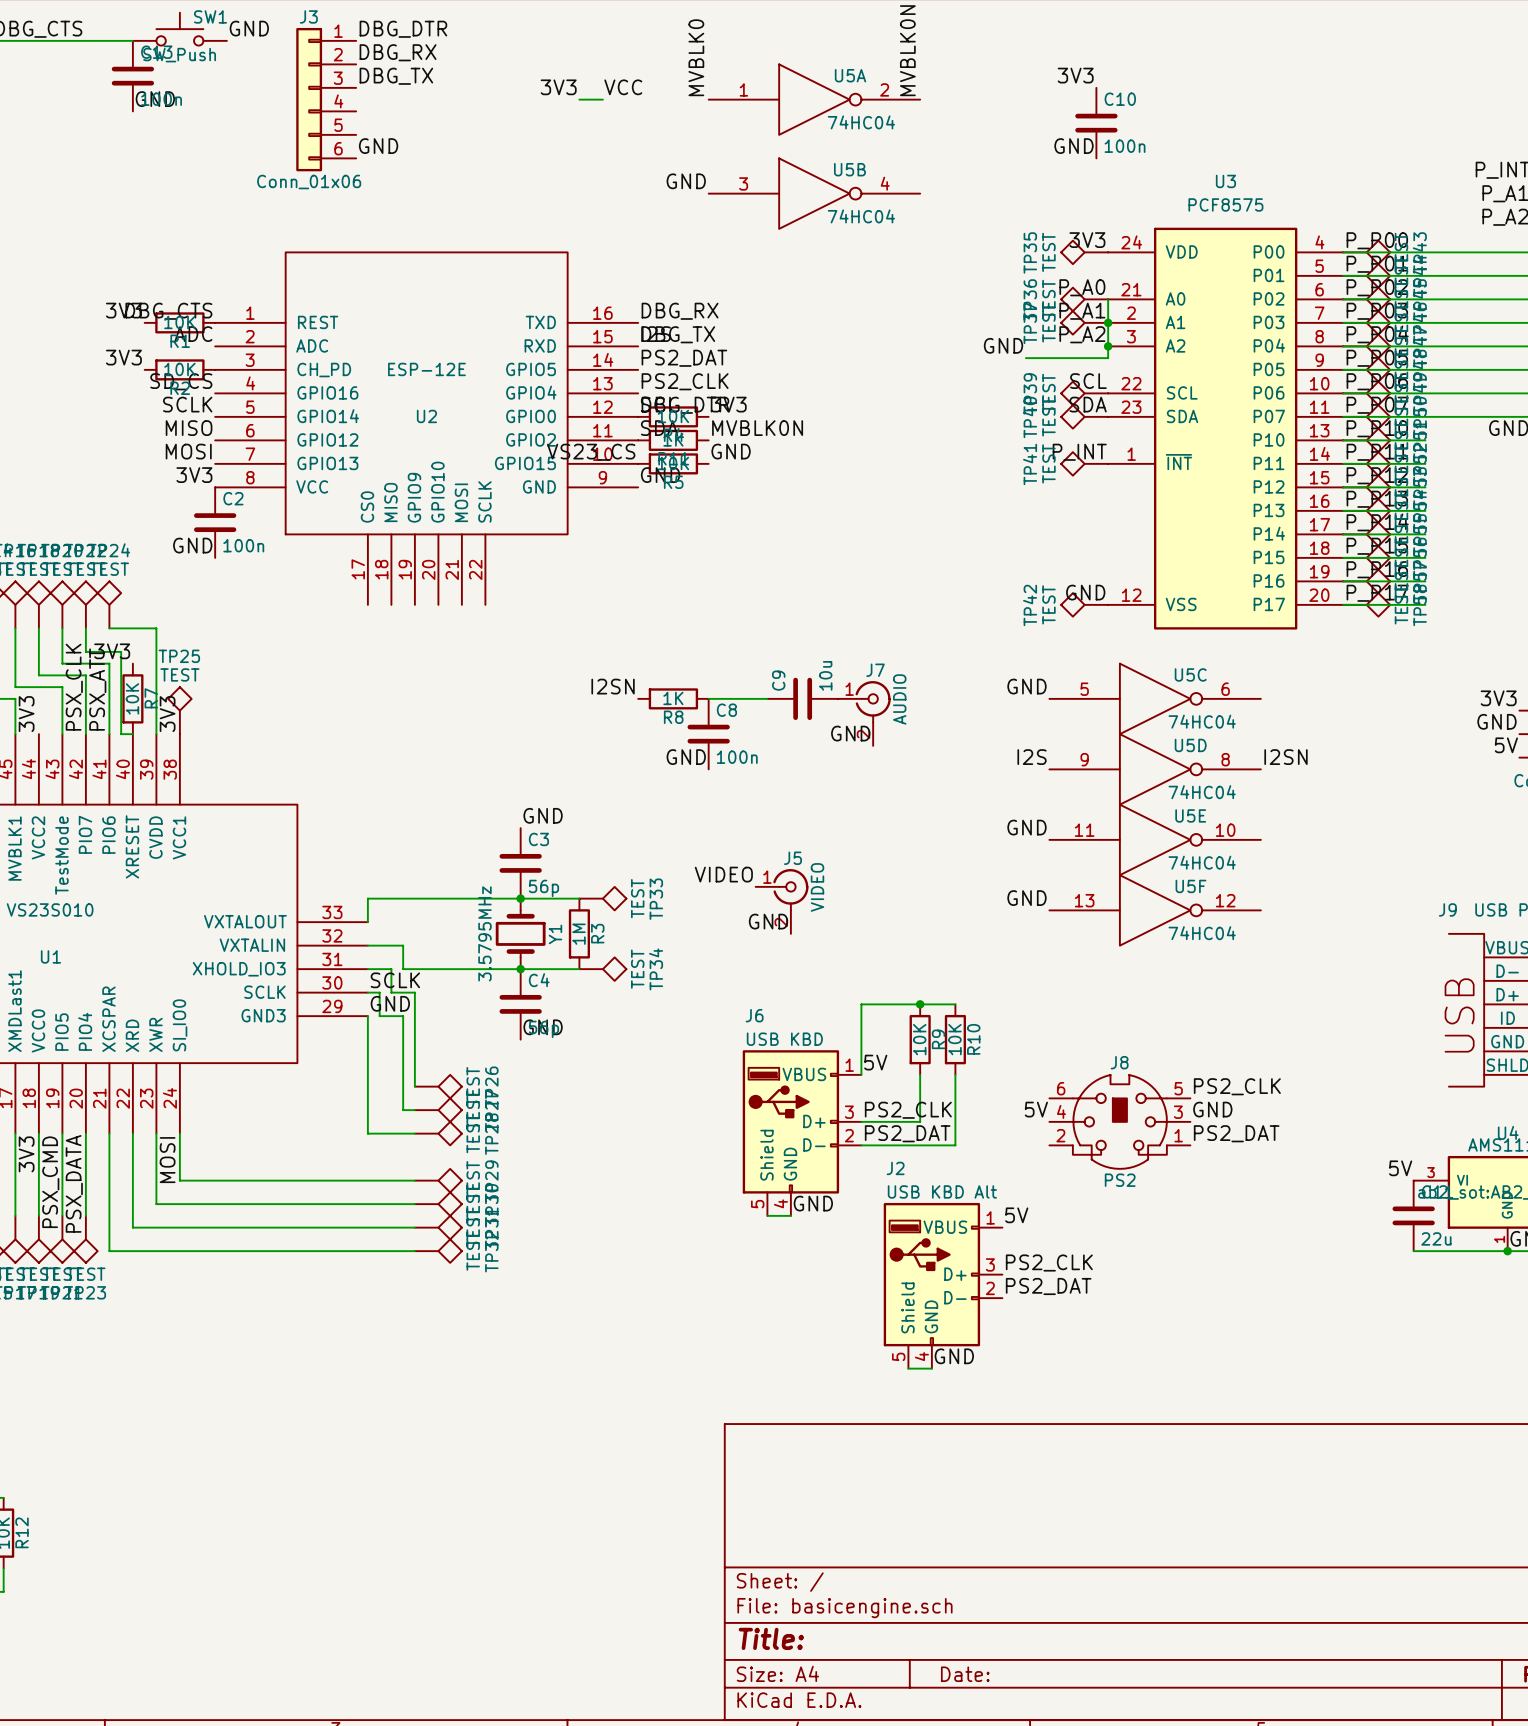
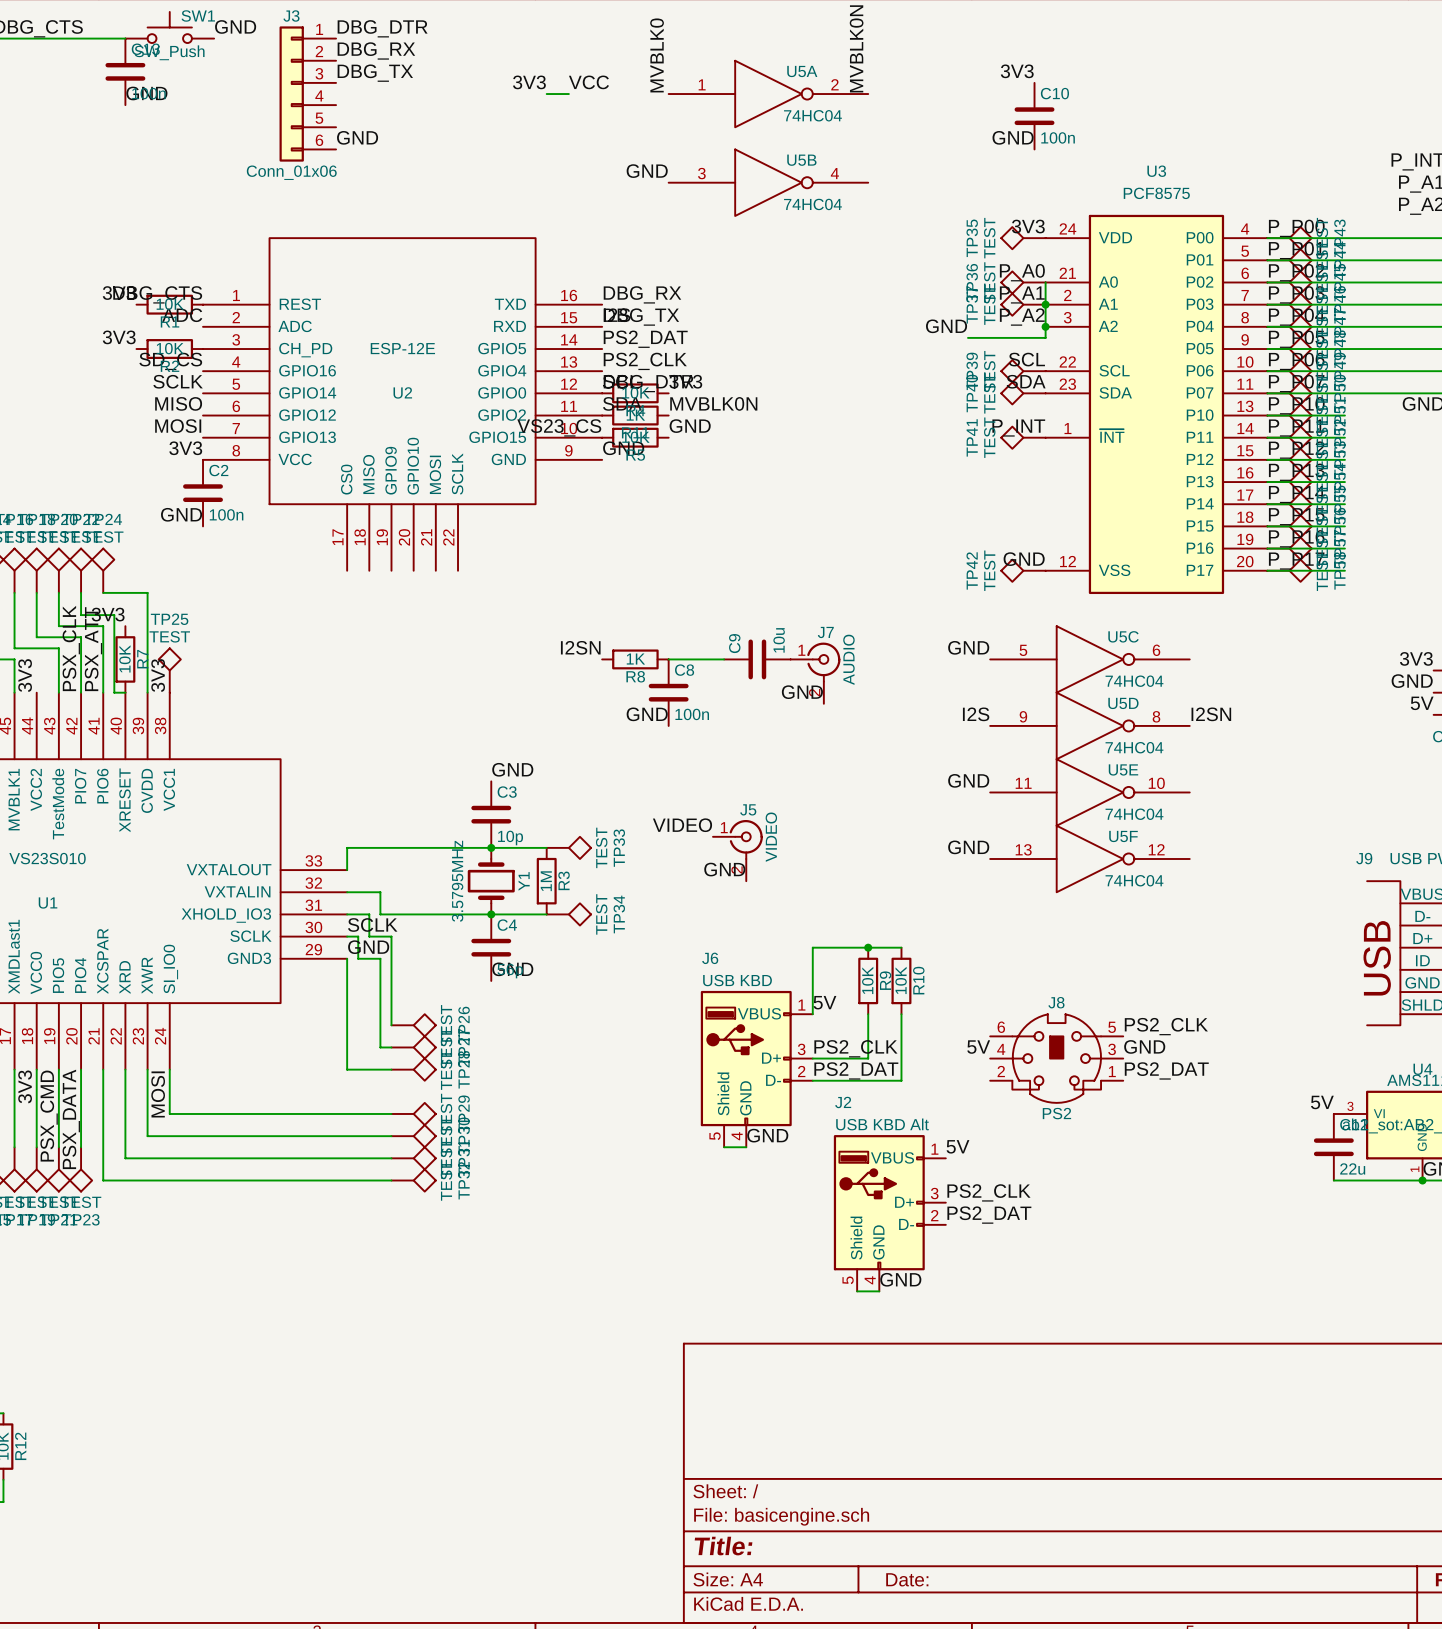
C3 value: 56p (543, 888) -> 10p (510, 837)

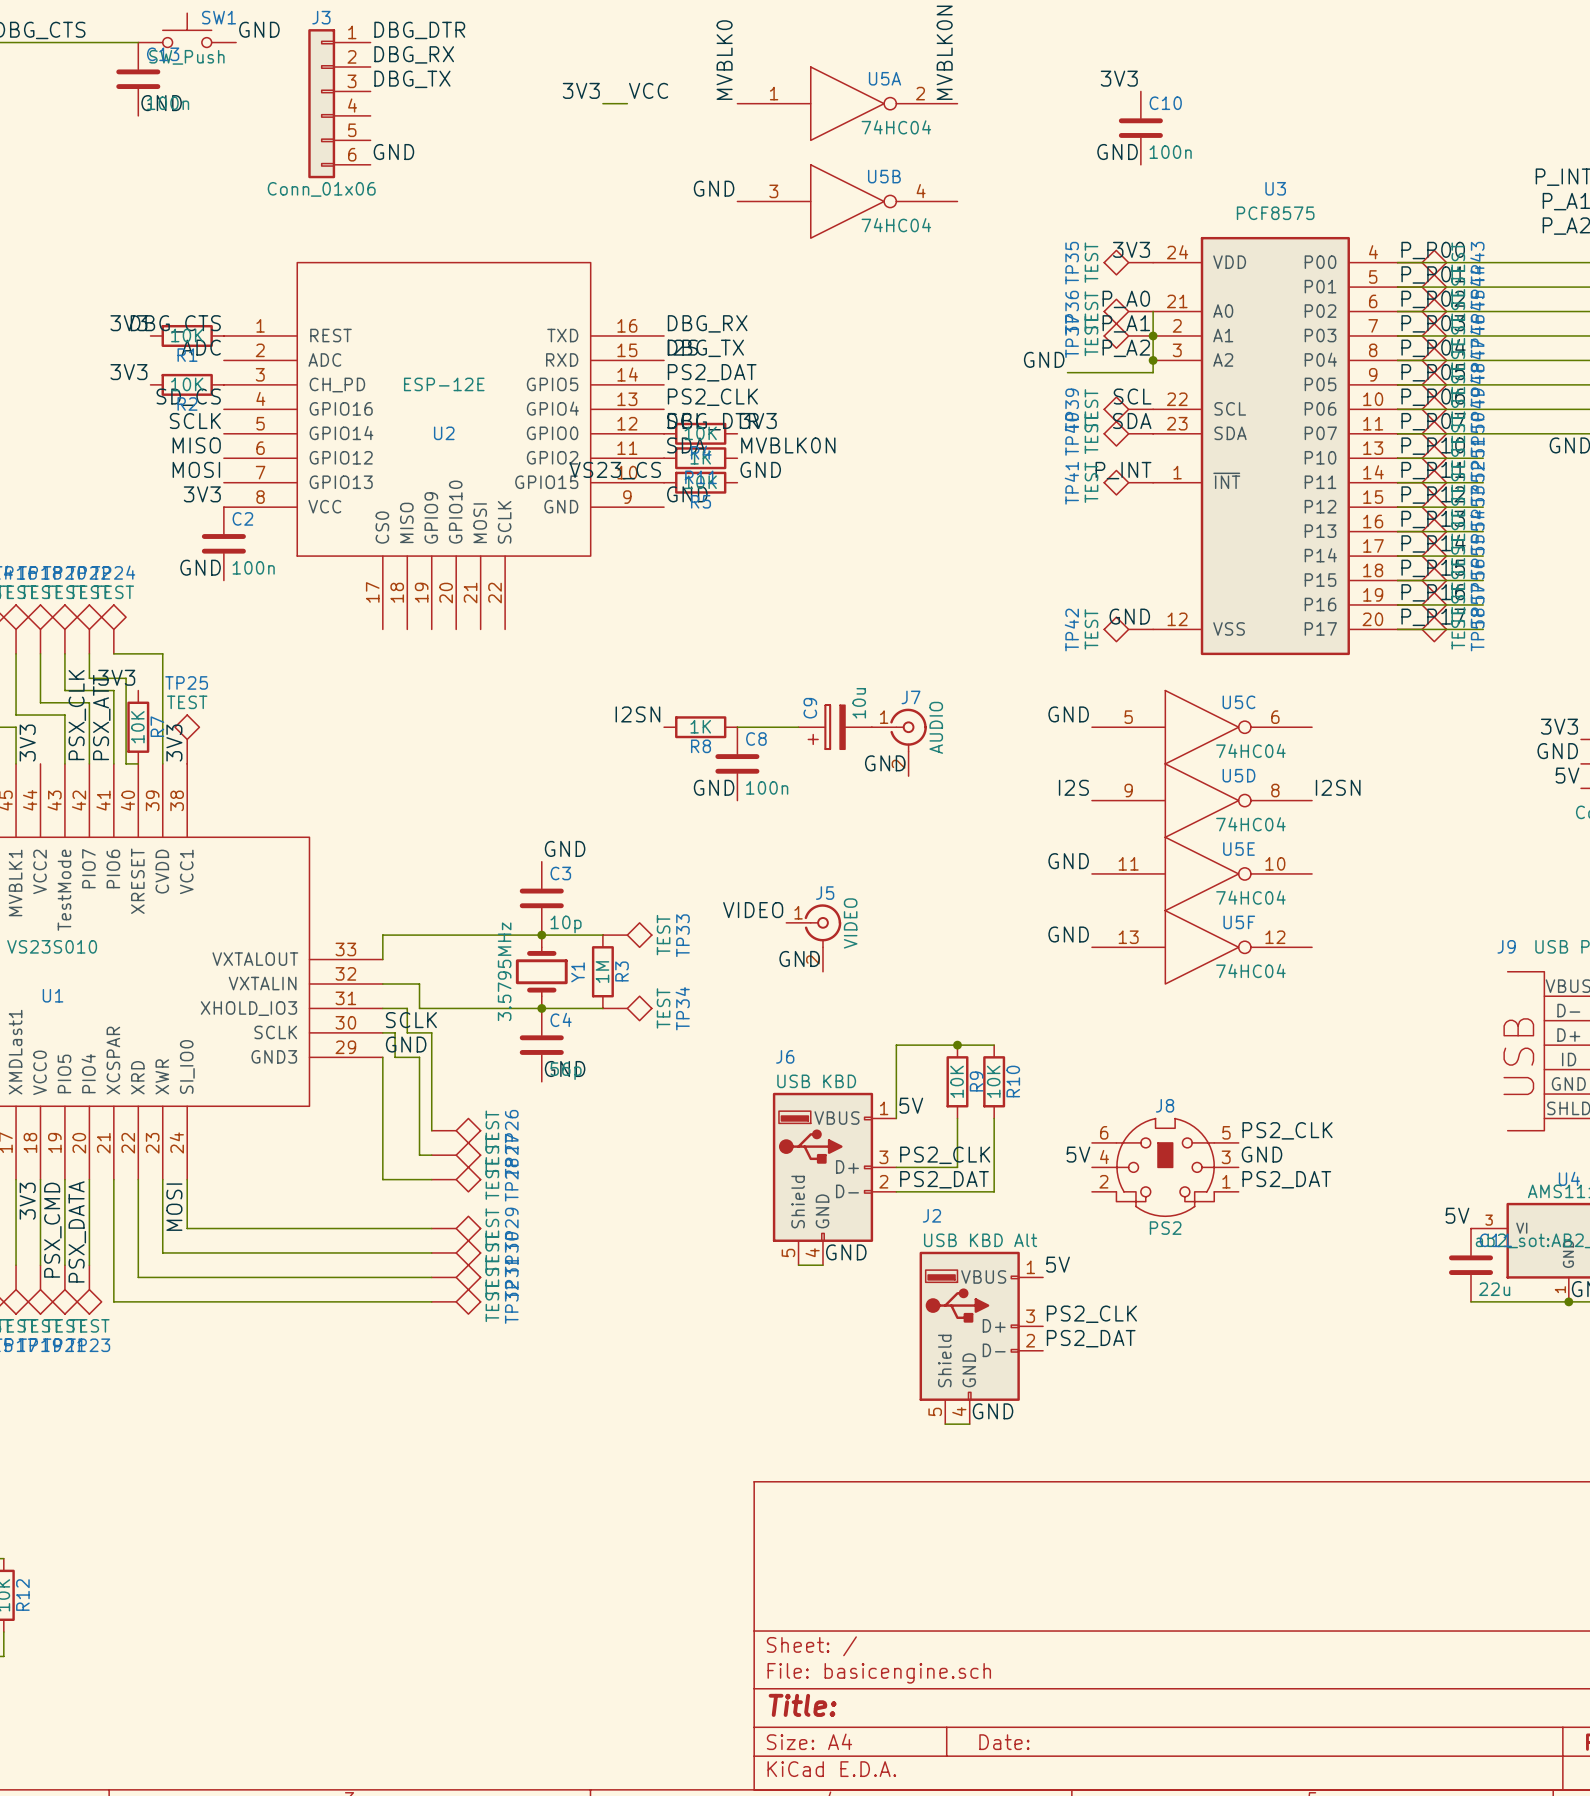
C9 symbol: [724, 639, 791, 680] -> [798, 705, 872, 750]

